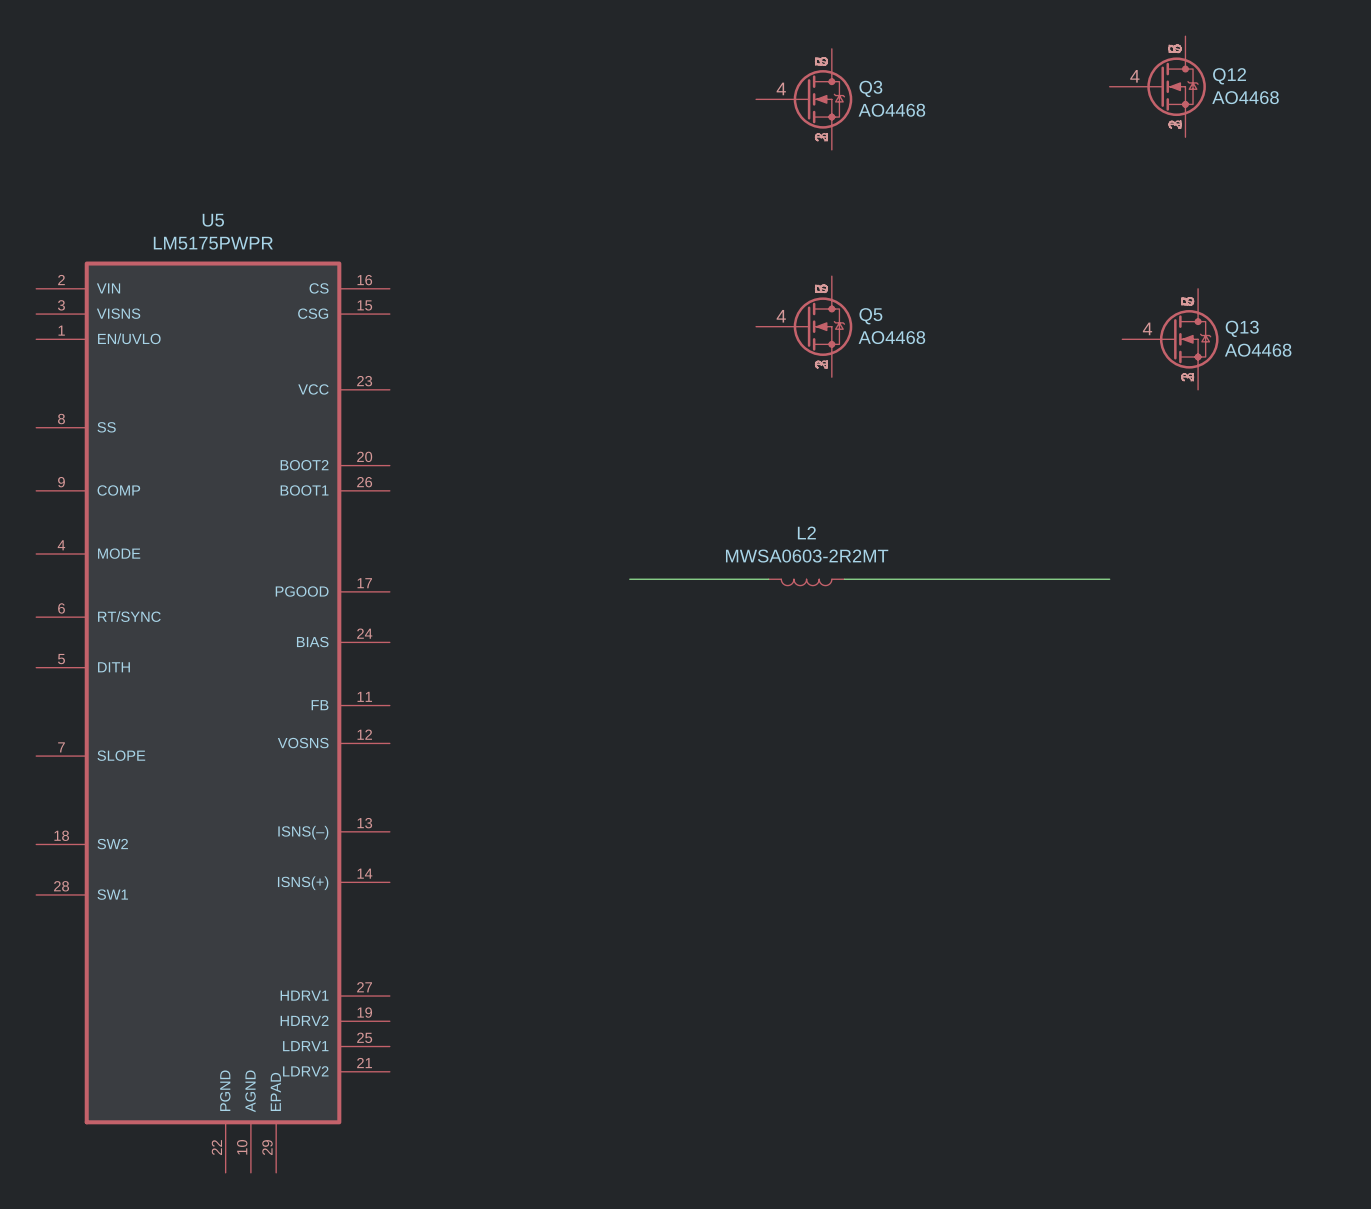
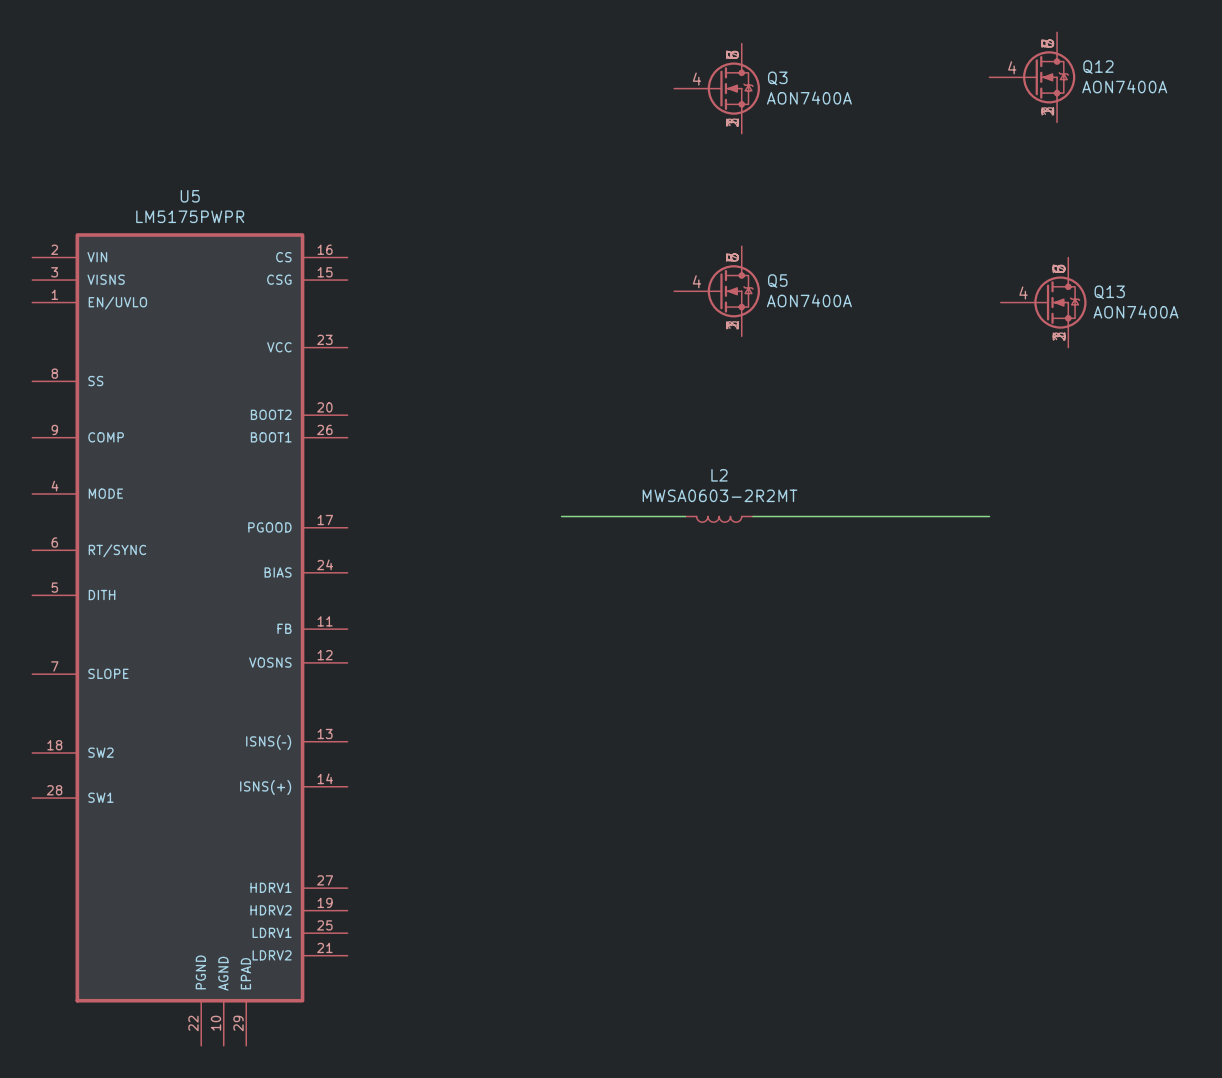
Q12 value: AO4468 (1245, 97) -> AON7400A (1124, 86)
Q3 value: AO4468 (891, 110) -> AON7400A (809, 98)
Q5 value: AO4468 (891, 337) -> AON7400A (809, 300)
Q13 value: AO4468 (1258, 350) -> AON7400A (1135, 312)

